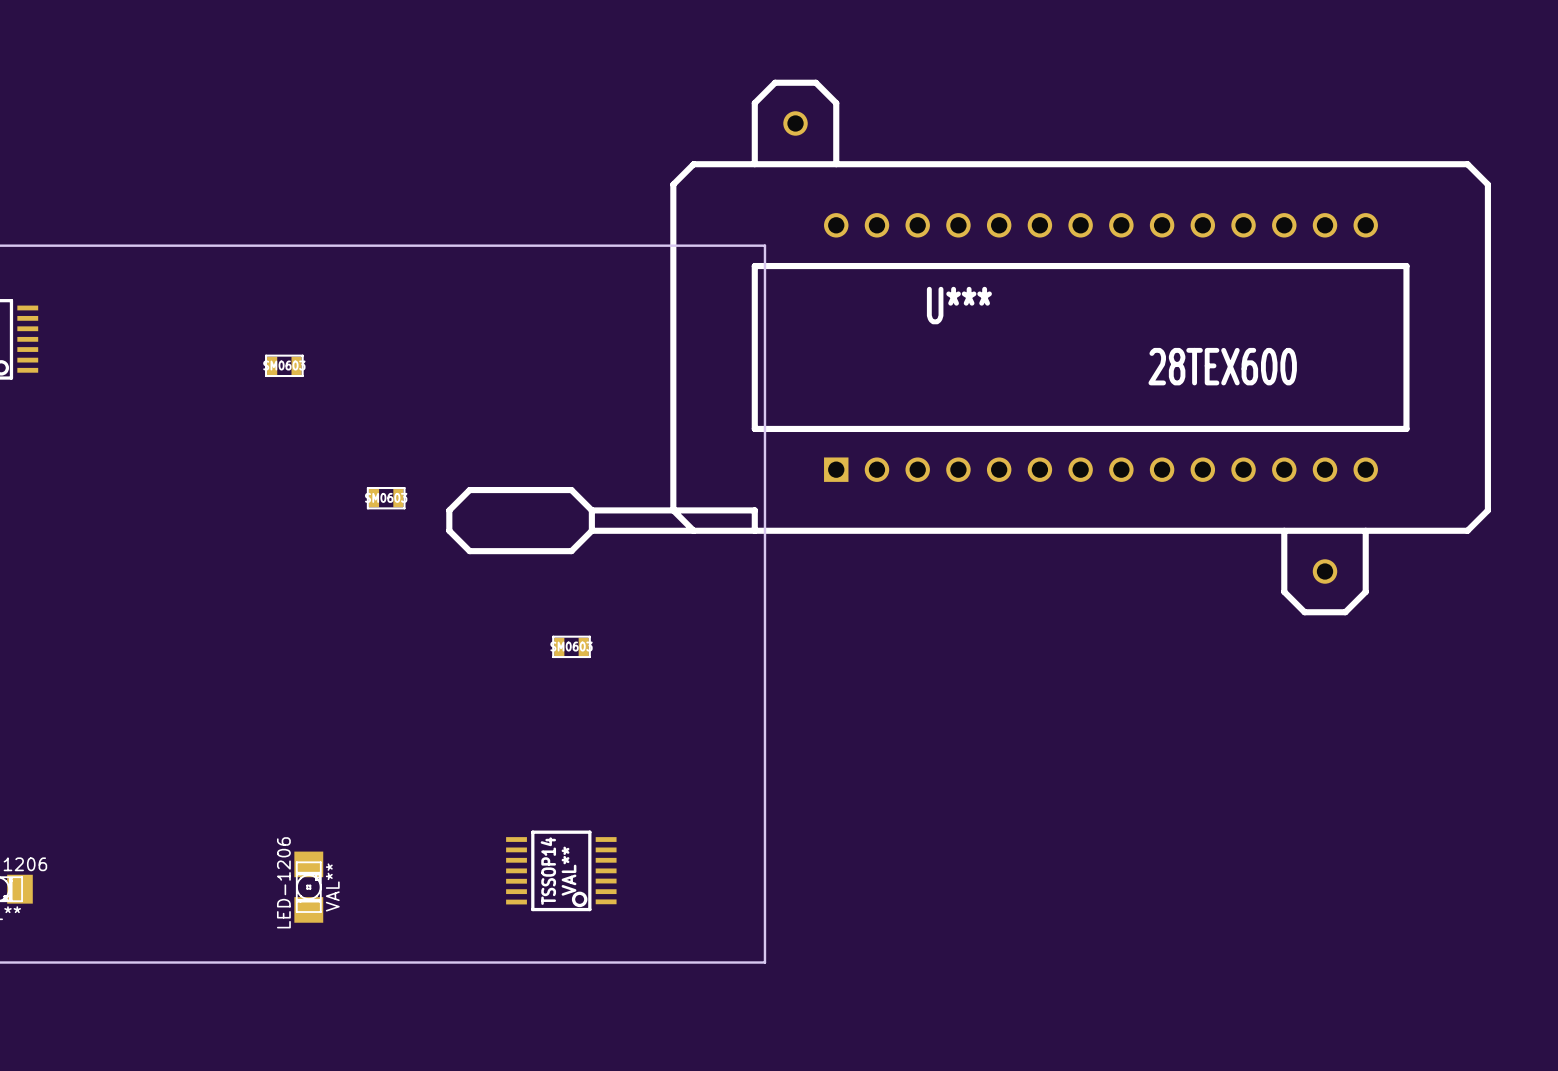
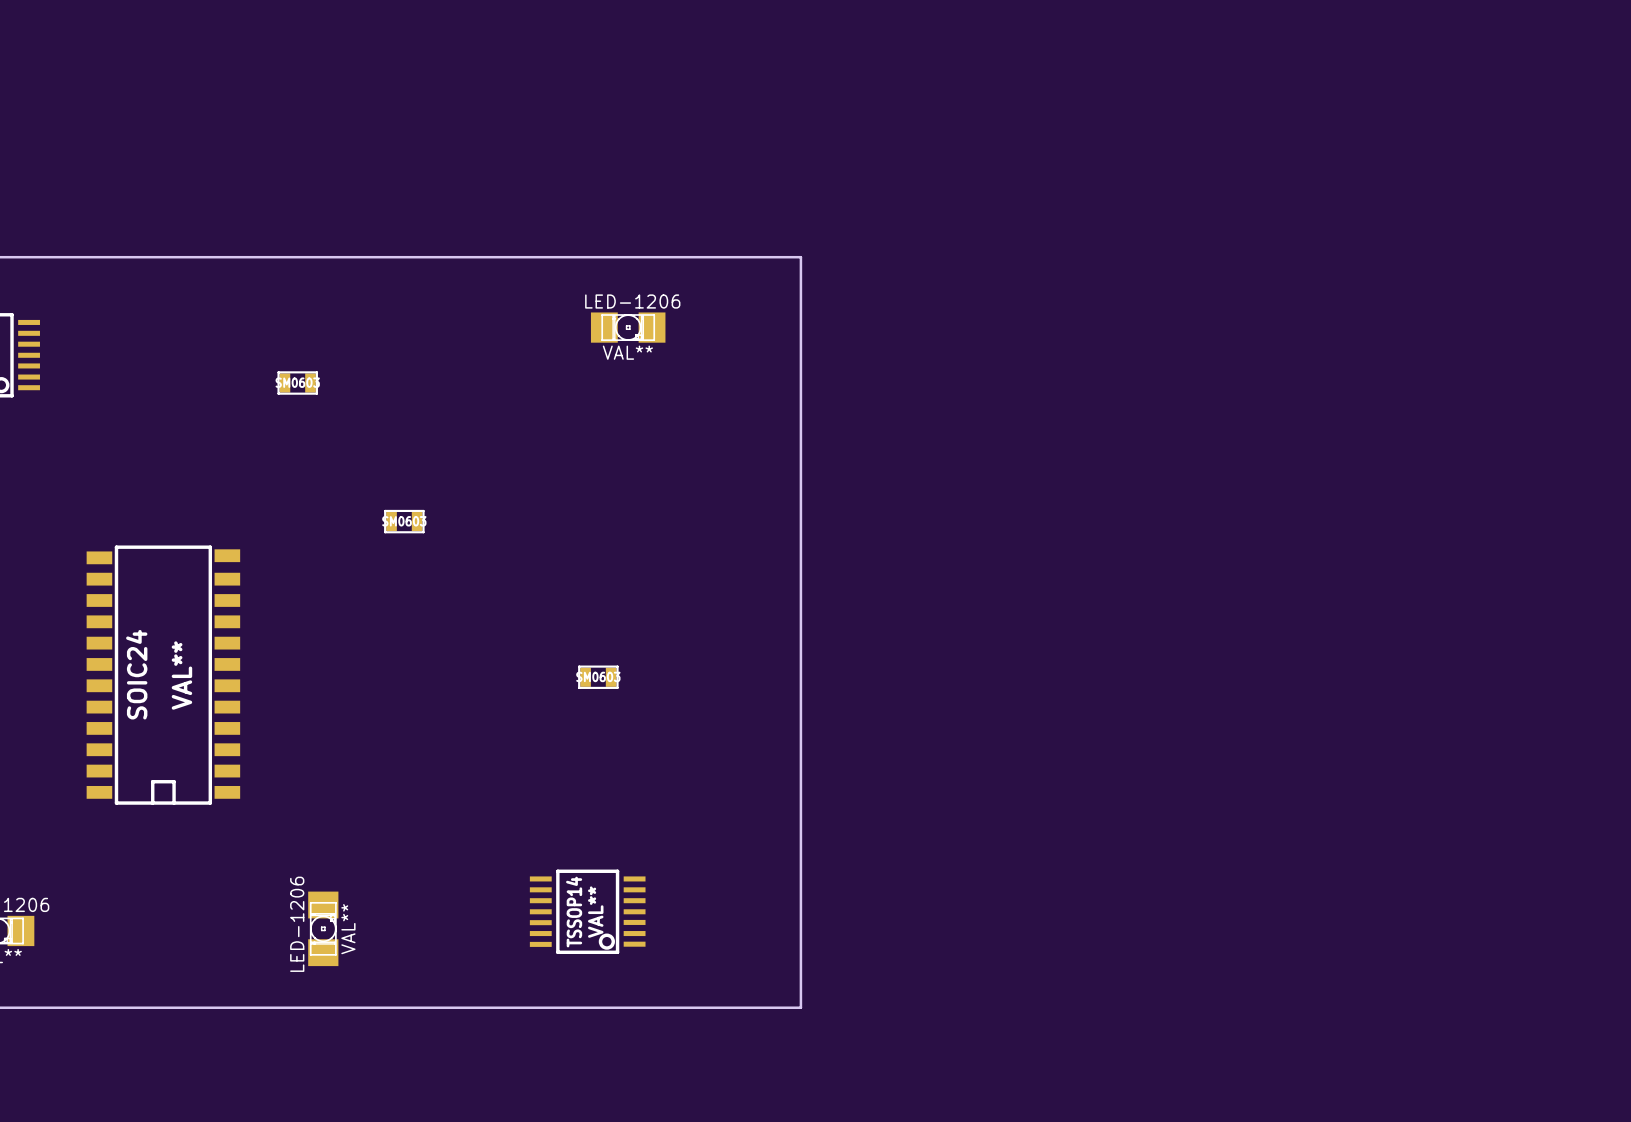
LED-1206: none -> VAL** (628, 327)
U***: 28TEX600 (968, 347) -> none
SOIC24: none -> VAL** (163, 675)

